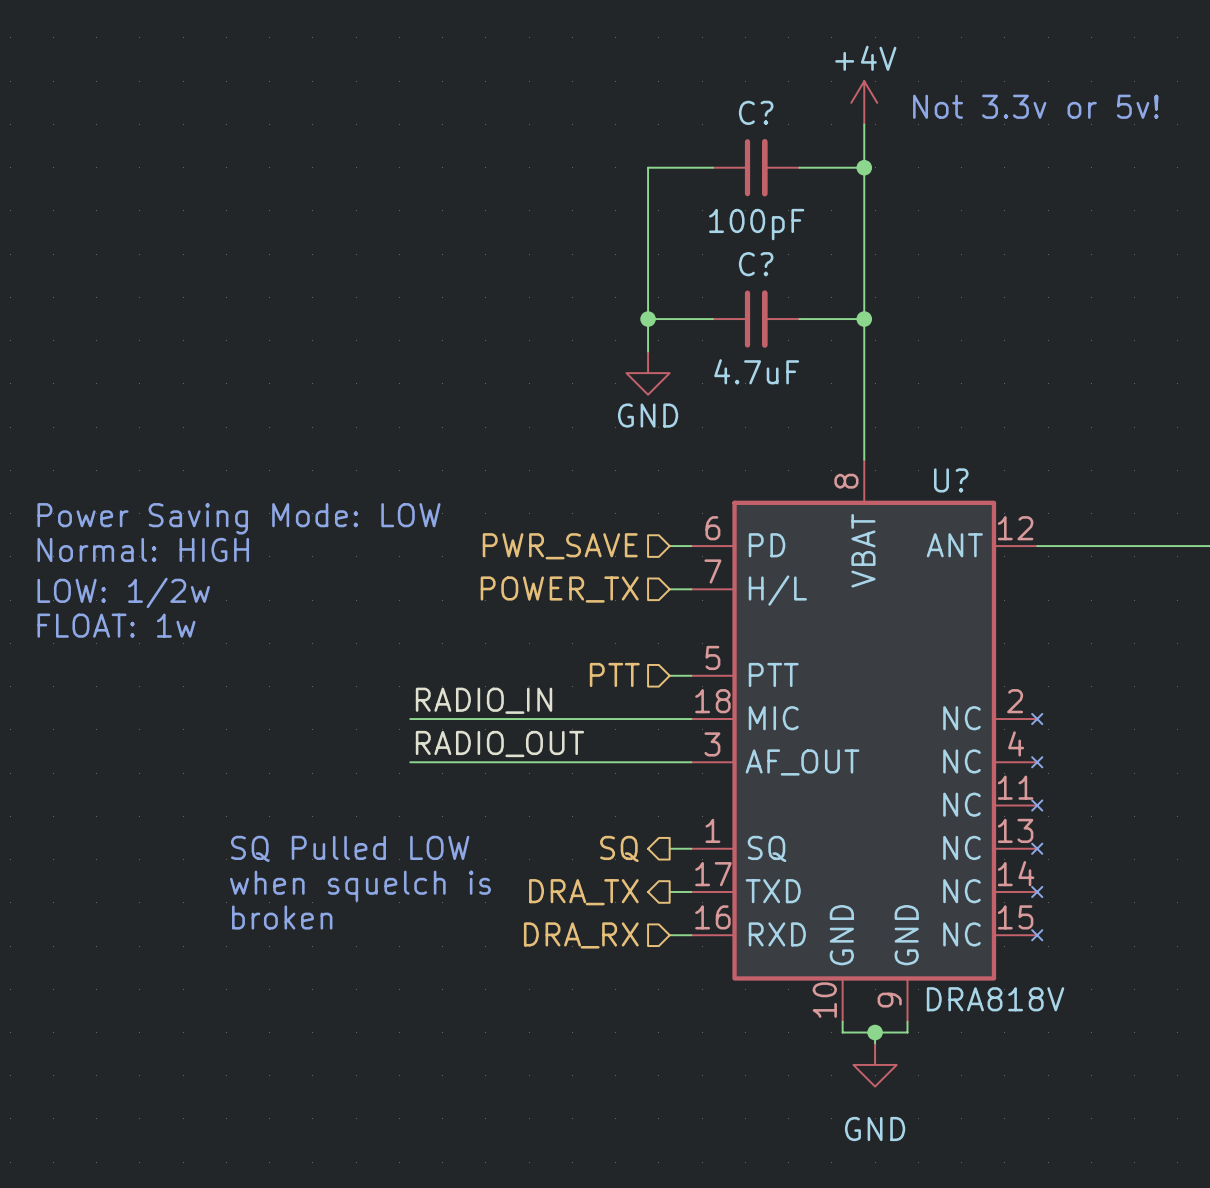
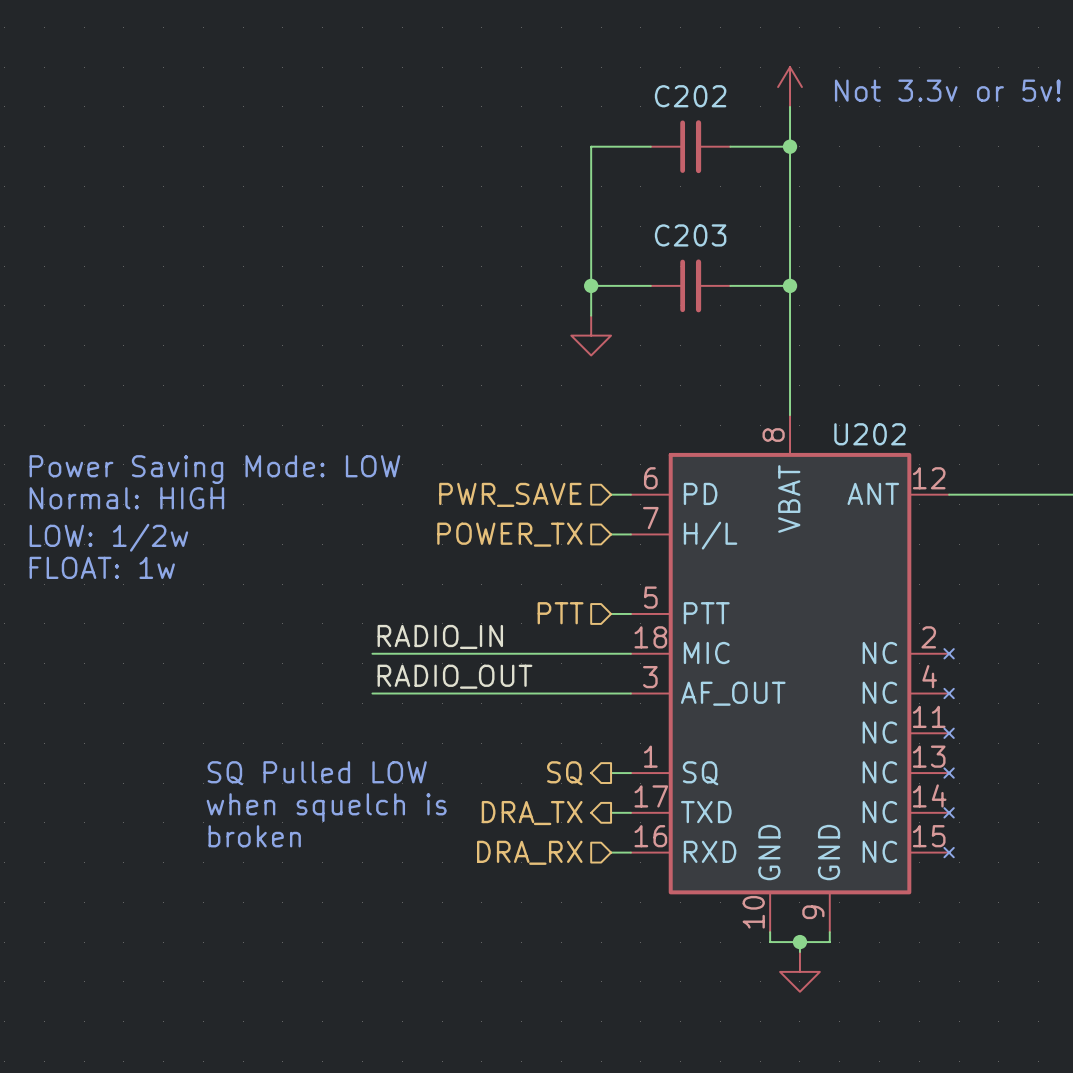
power symbol text: +4V (865, 58) -> none
C? name: C? (756, 112) -> C202 (690, 96)
C? value: 100pF (756, 224) -> none
C? name: C? (756, 264) -> C203 (690, 235)
C? value: 4.7uF (756, 371) -> none
power symbol text: GND (648, 415) -> none
U? name: U? (951, 480) -> U202 (870, 434)
U? value: DRA818V (995, 999) -> none
power symbol text: GND (875, 1129) -> none

